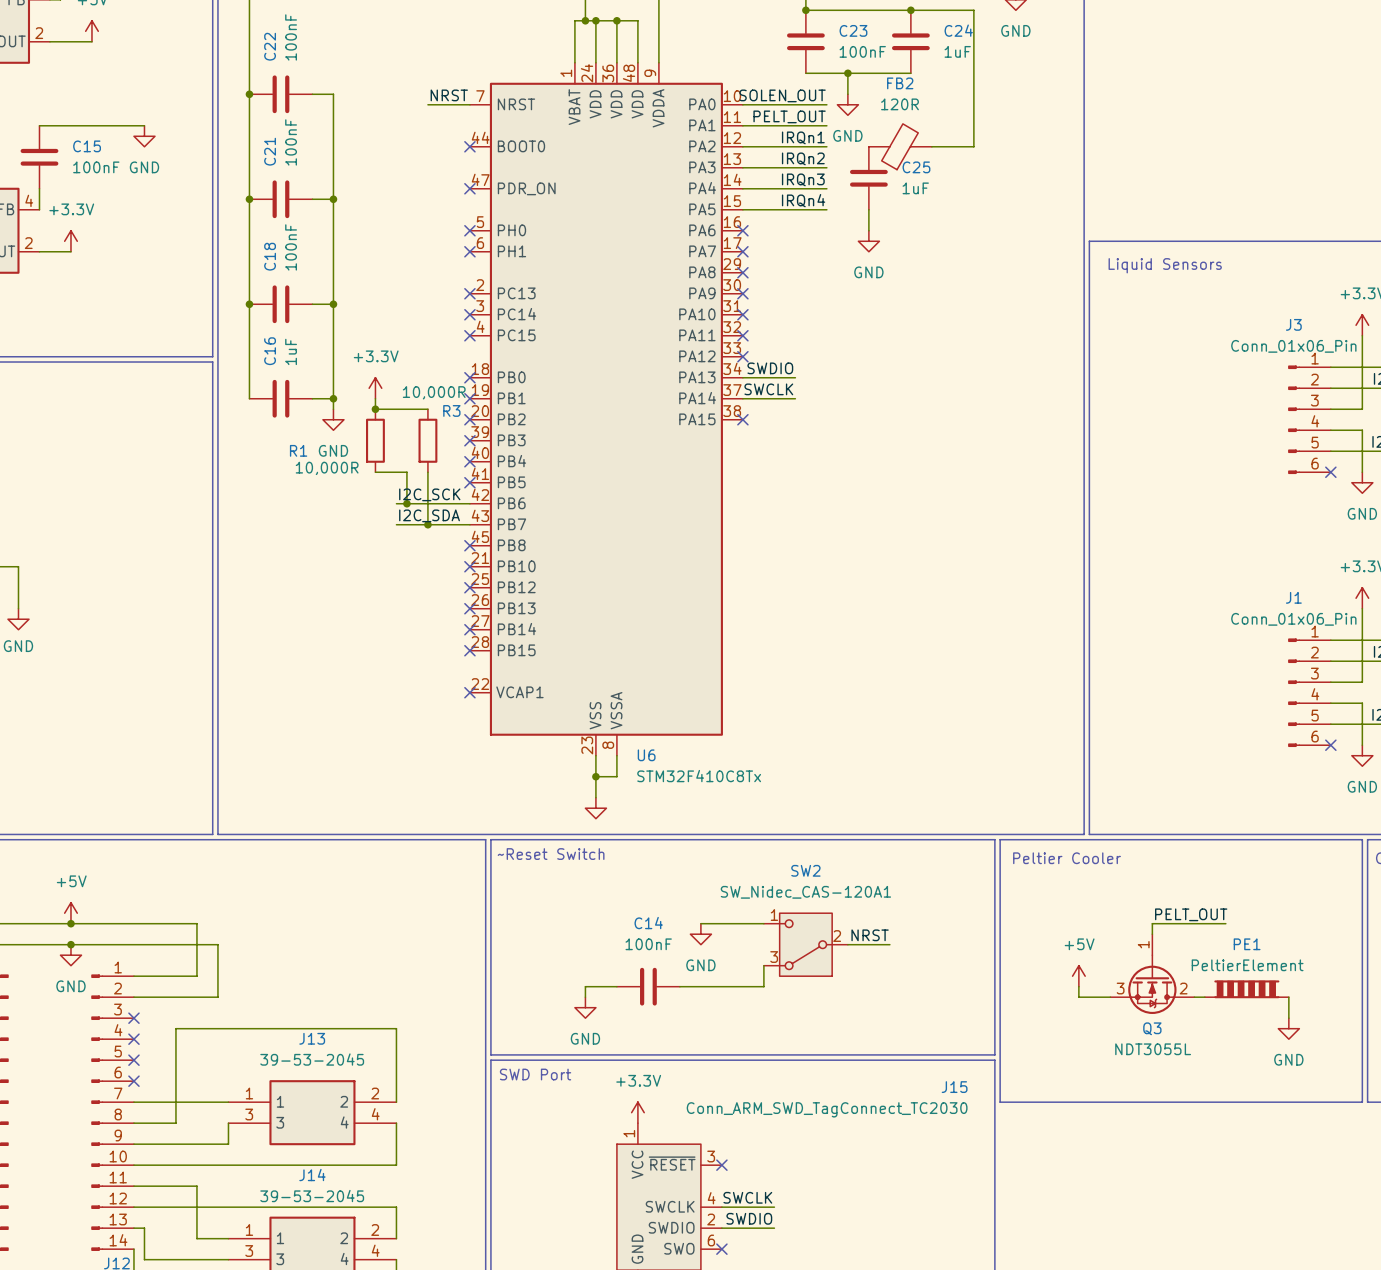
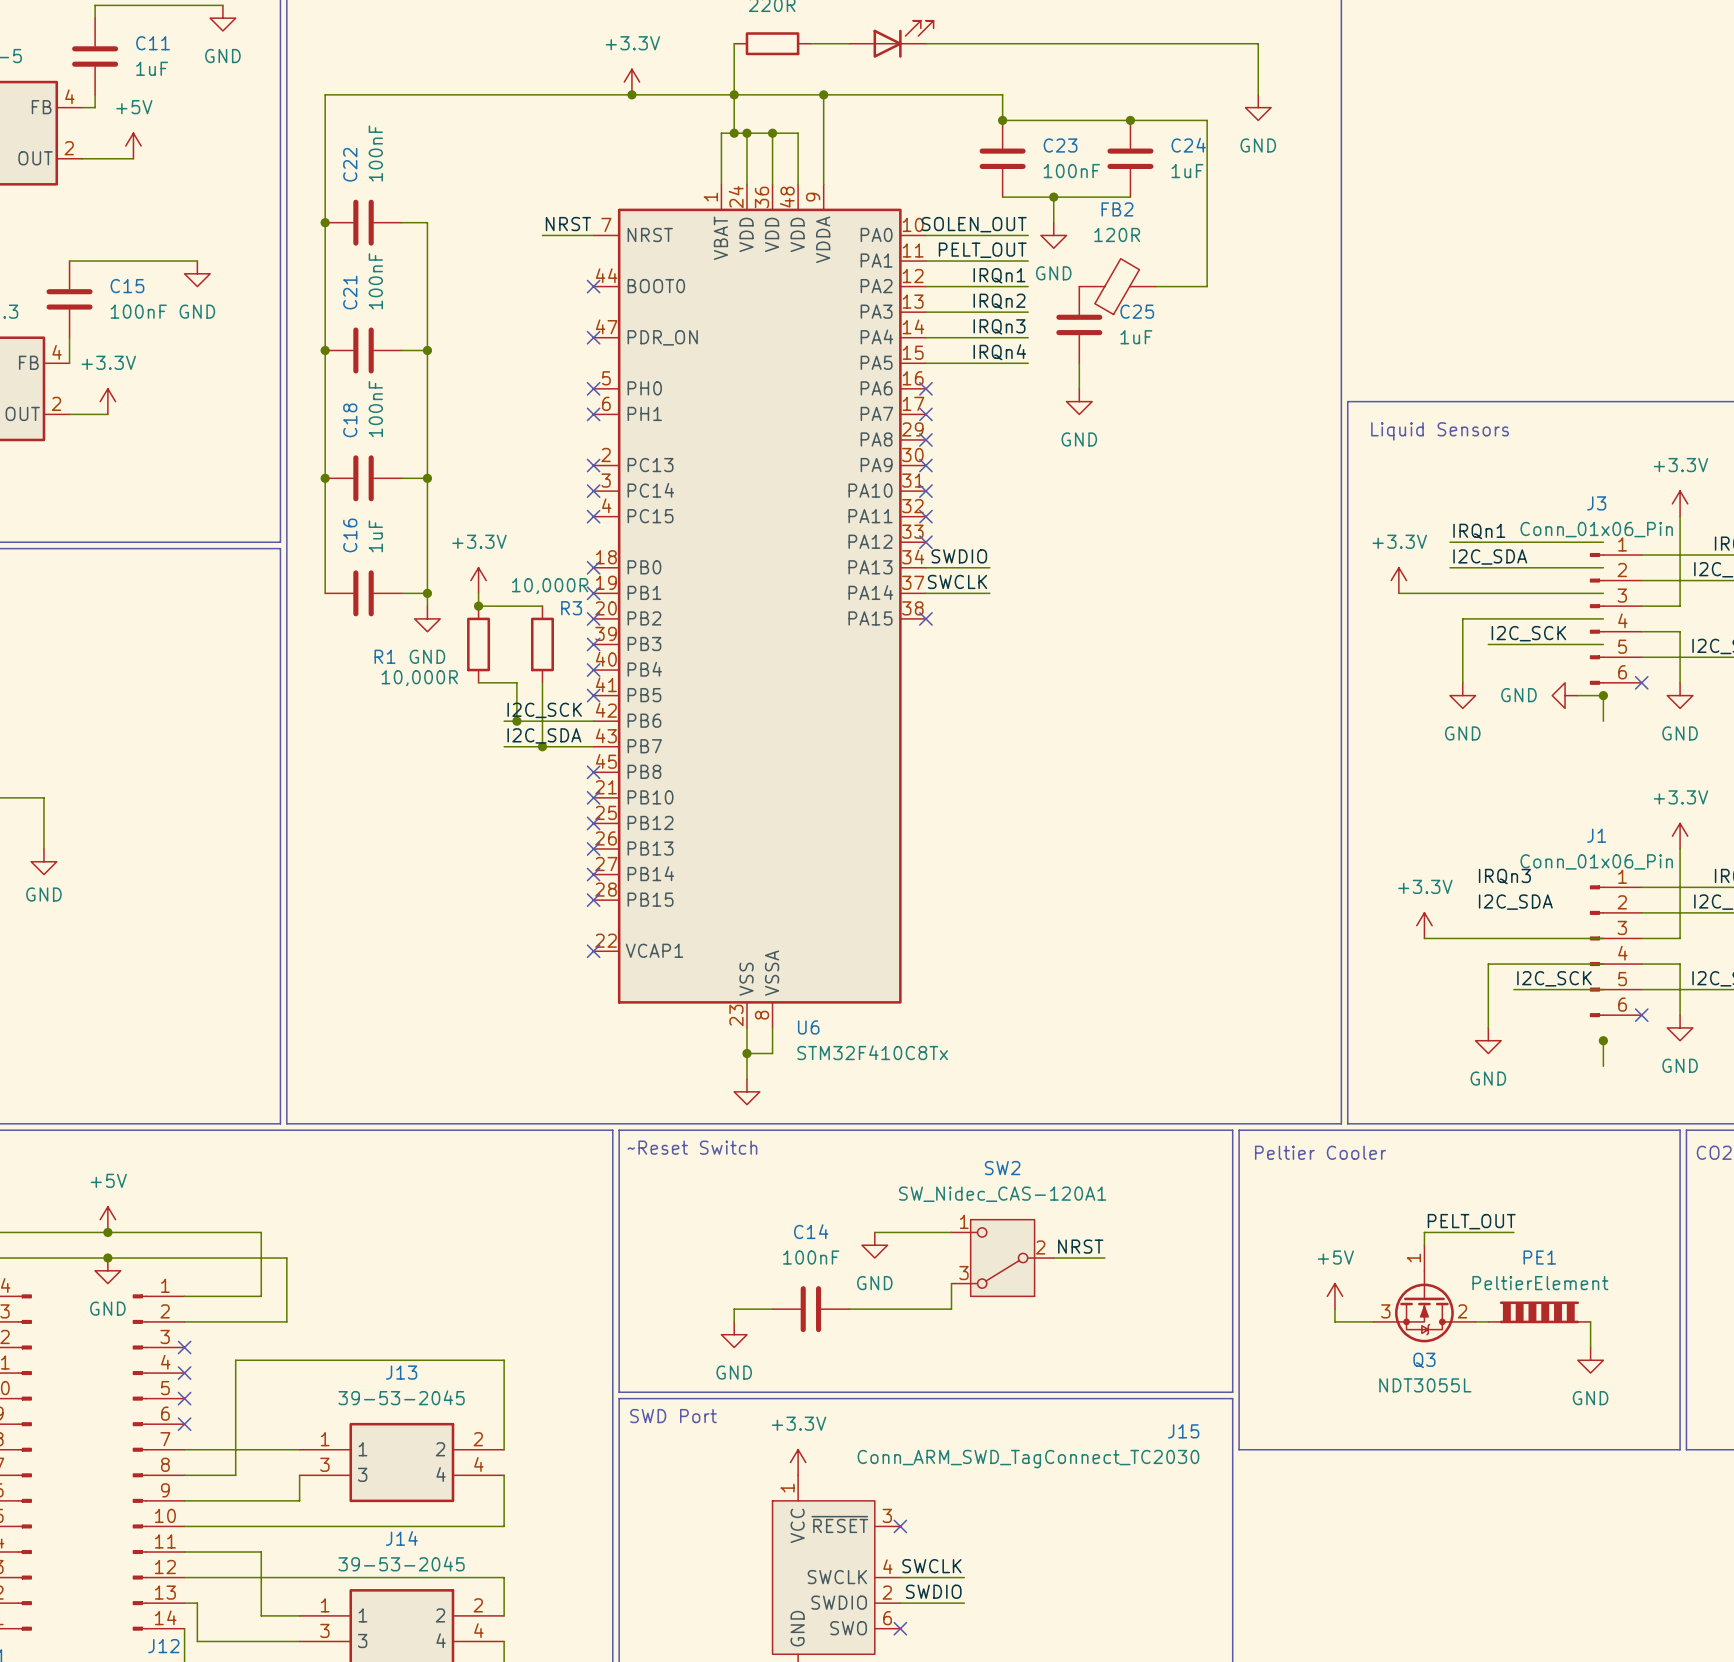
label: none -> IRQn1 (1479, 531)
wire: none -> (1449, 542) (1603, 542)
label: none -> I2C_SDA (1490, 556)
wire: none -> (1449, 567) (1603, 567)
power symbol: none -> +3.3V (1398, 580)
wire: none -> (1398, 593) (1603, 593)
wire: none -> (1603, 618) (1462, 618) (1462, 682)
label: none -> I2C_SCK (1528, 633)
wire: none -> (1488, 644) (1603, 644)
power symbol: none -> GND (1462, 695)
power symbol: none -> GND (1565, 695)
wire: none -> (1577, 695) (1603, 695) (1603, 721)
junction: none -> (1603, 695)
label: none -> IRQn3 (1504, 876)
label: none -> I2C_SDA (1515, 902)
power symbol: none -> +3.3V (1424, 925)
wire: none -> (1424, 938) (1603, 938)
wire: none -> (1603, 964) (1488, 964) (1488, 1027)
label: none -> I2C_SCK (1554, 978)
wire: none -> (1513, 989) (1603, 989)
power symbol: none -> GND (1488, 1040)
wire: none -> (1603, 1040) (1603, 1066)
junction: none -> (1603, 1040)

